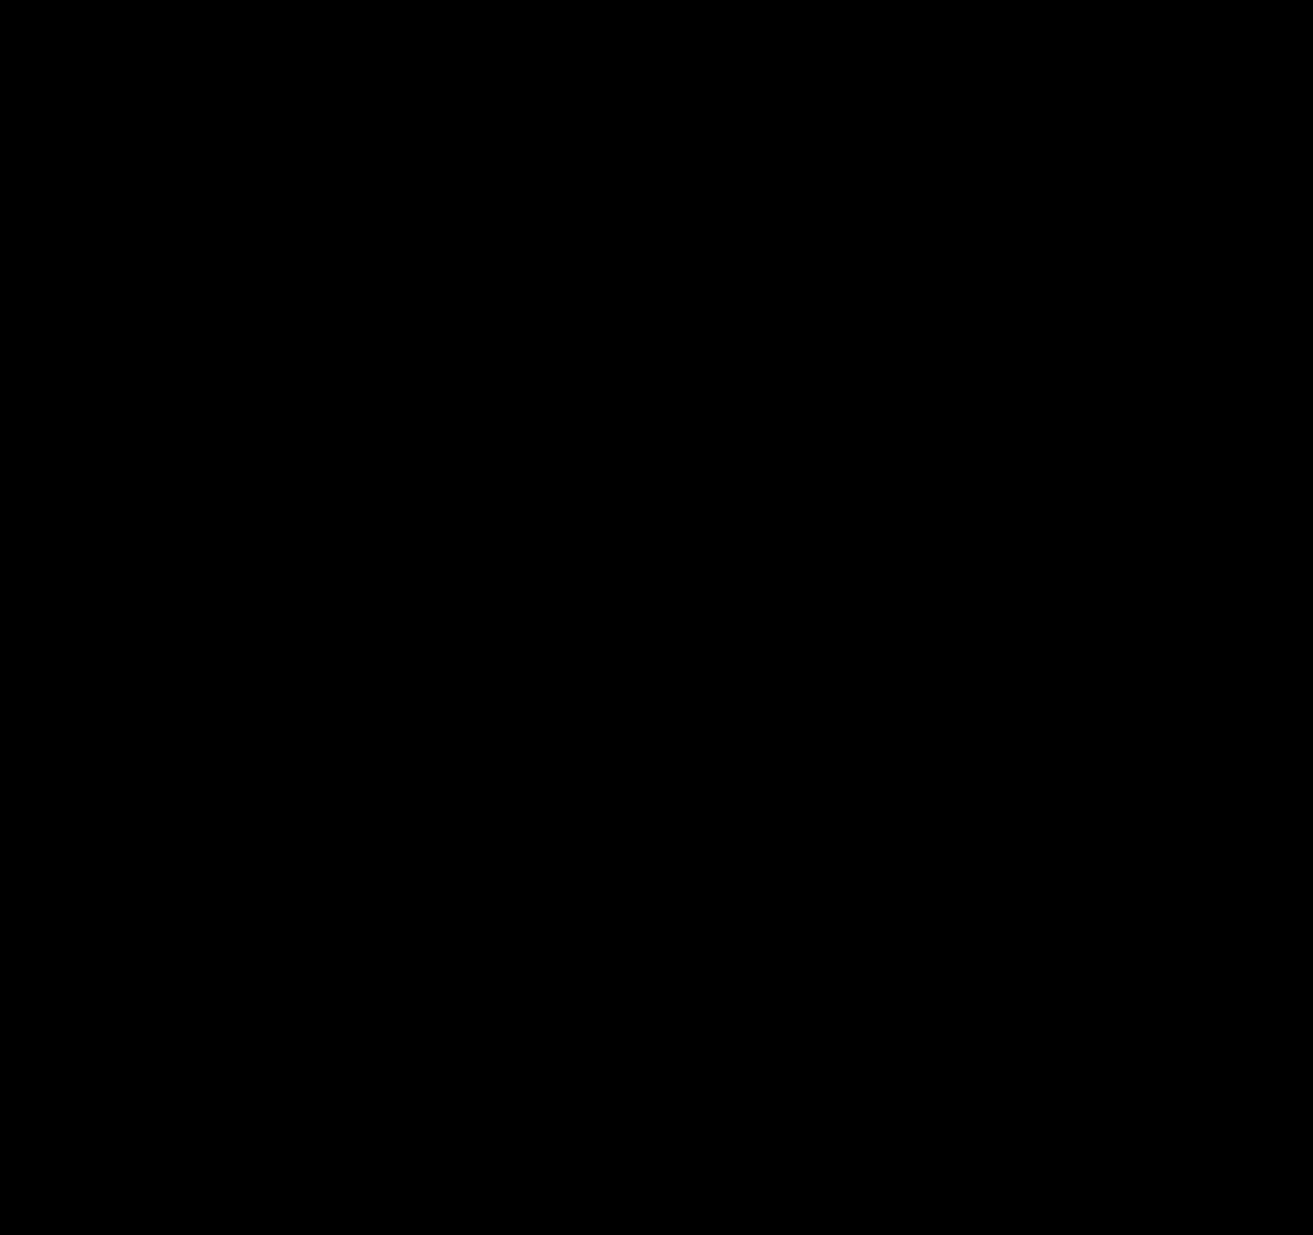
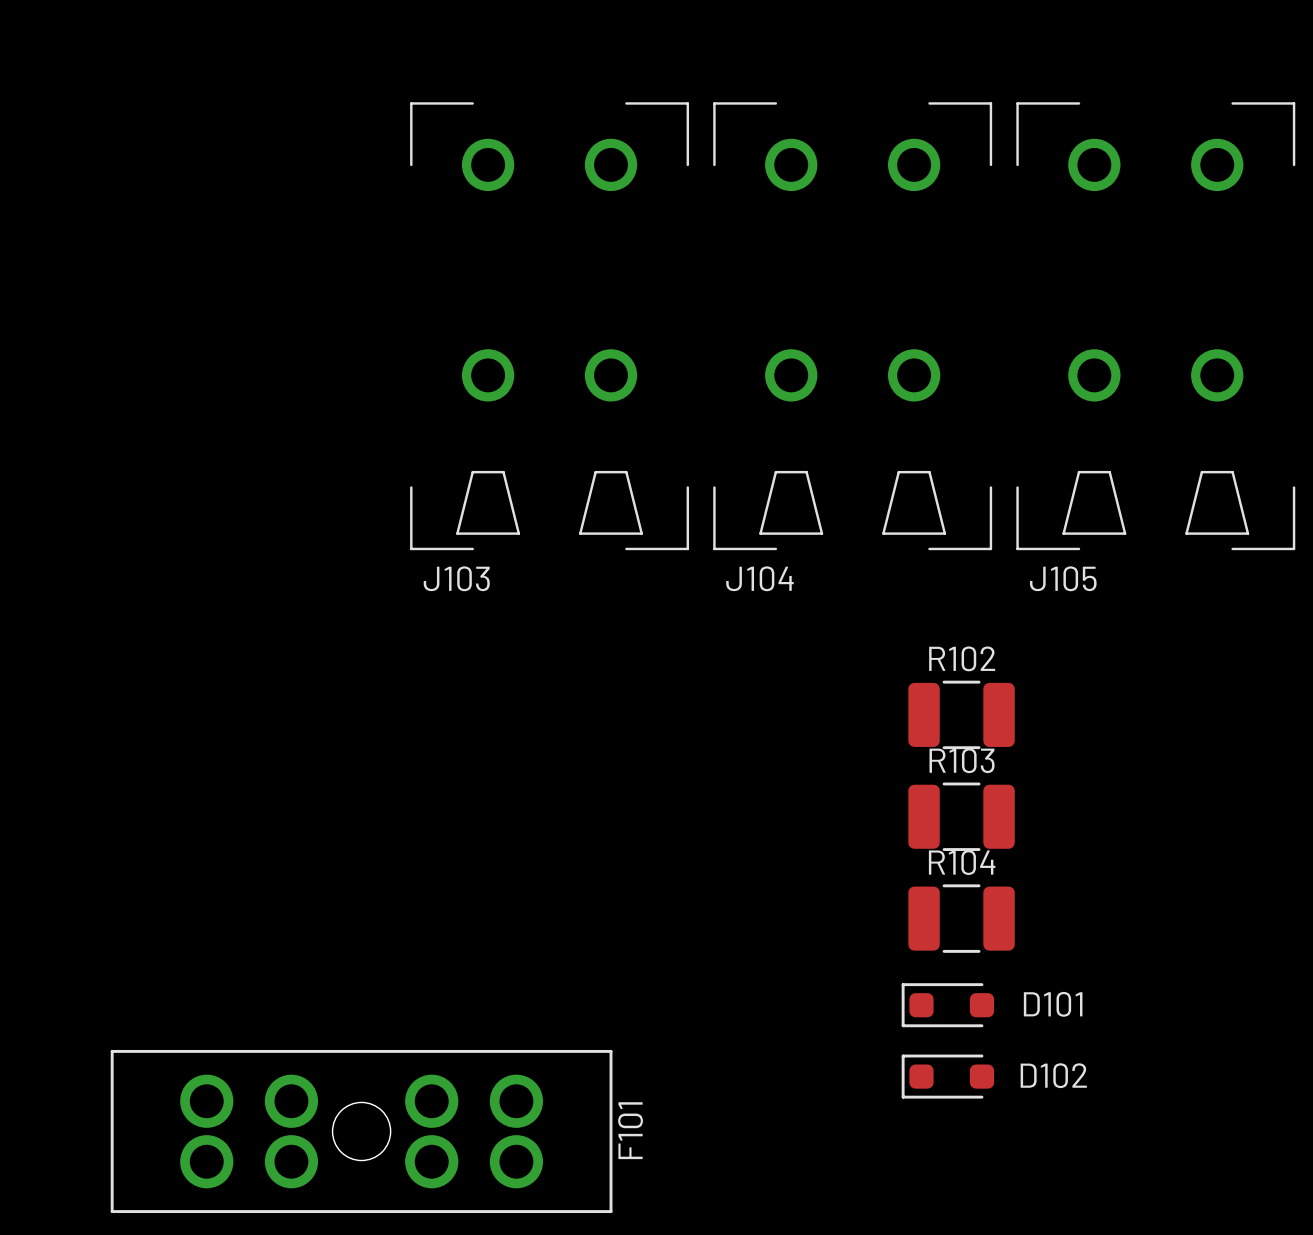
J103: none -> (549, 326)
J104: none -> (852, 326)
J105: none -> (1155, 326)
R102: none -> (961, 714)
R103: none -> (961, 816)
R104: none -> (961, 918)
D101: none -> (947, 1005)
D102: none -> (947, 1076)
F101: none -> (361, 1131)

